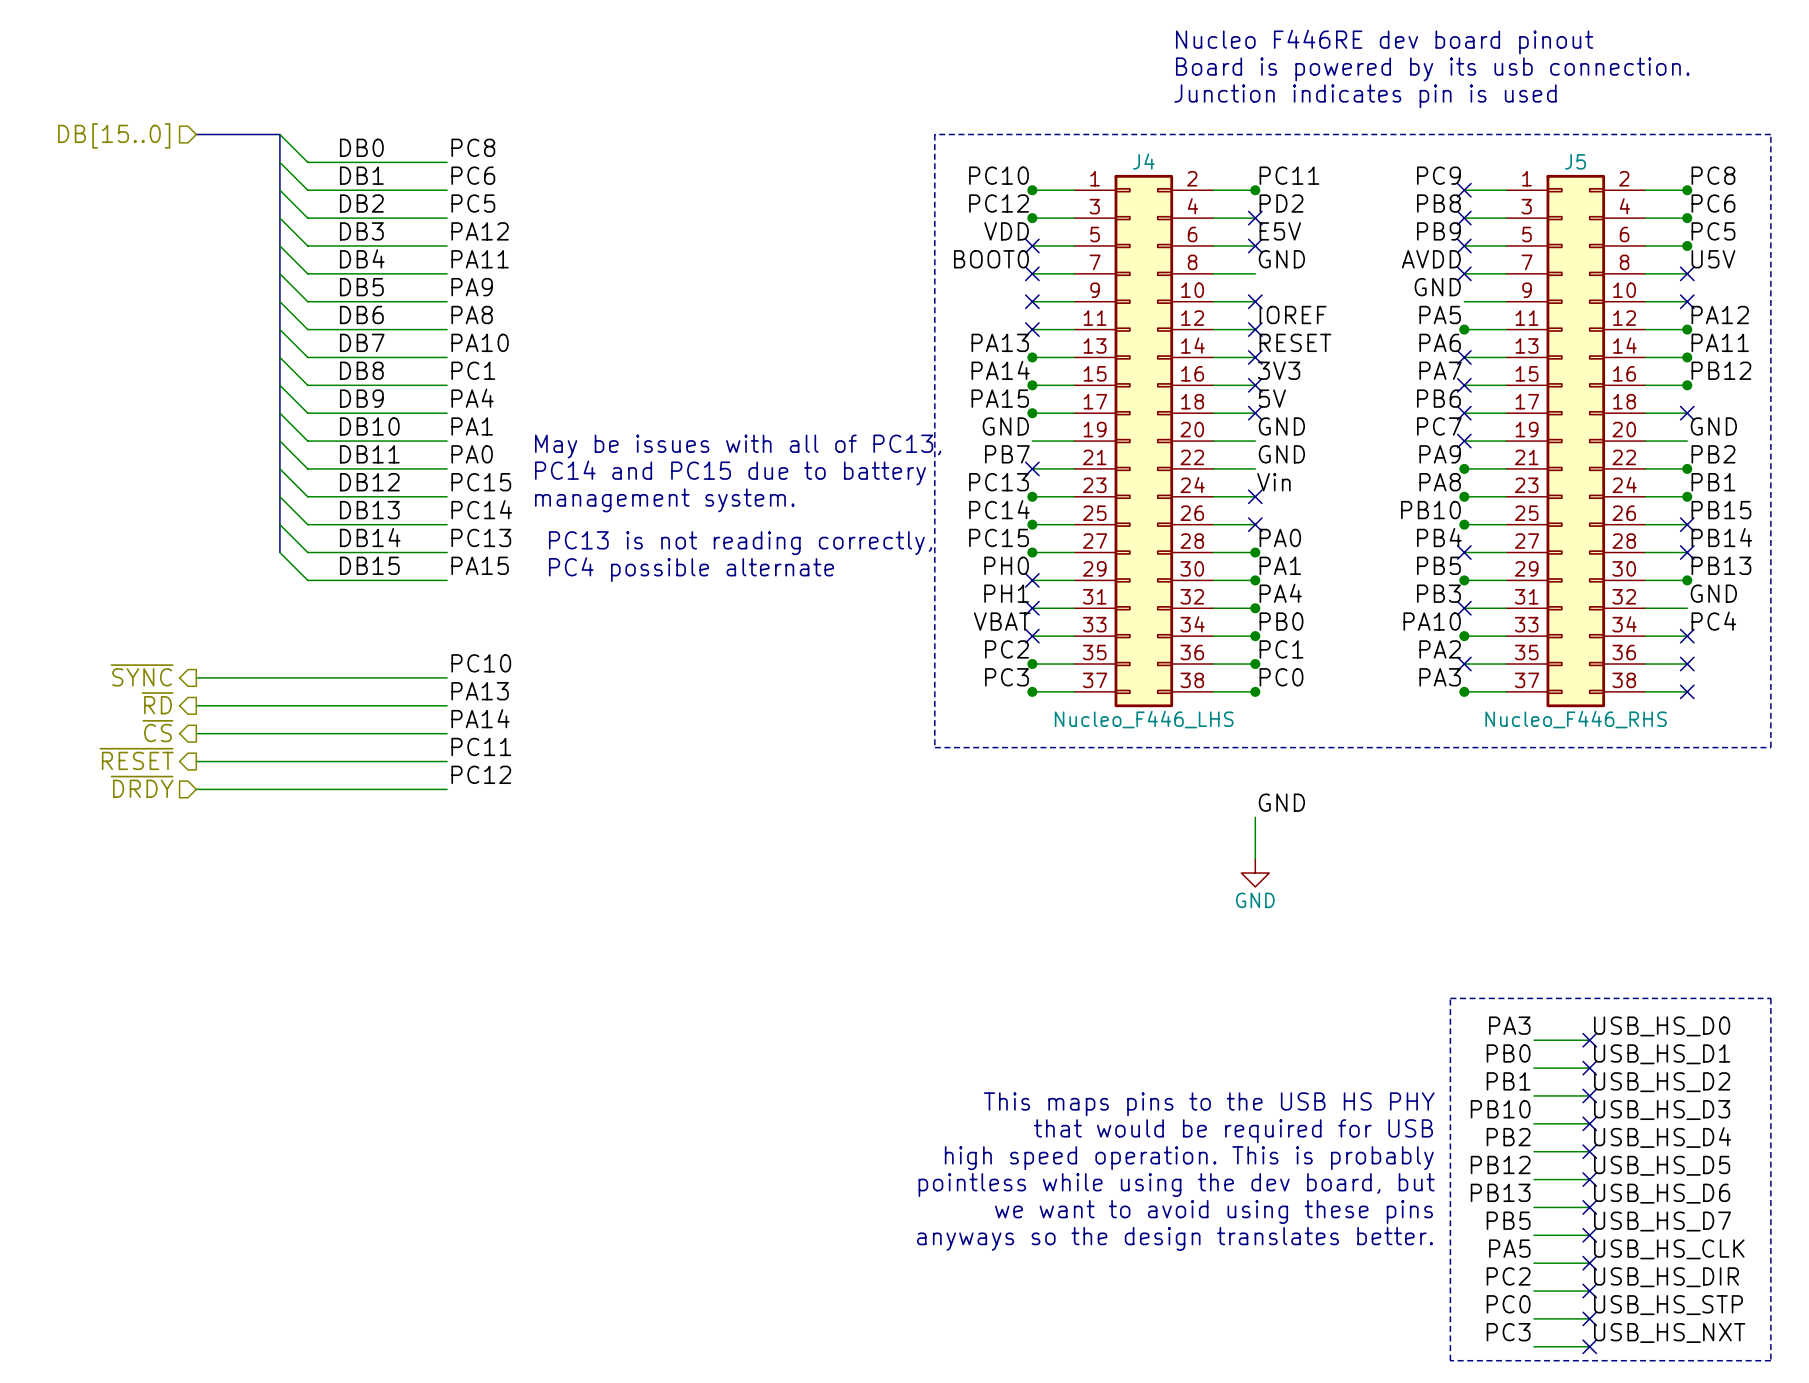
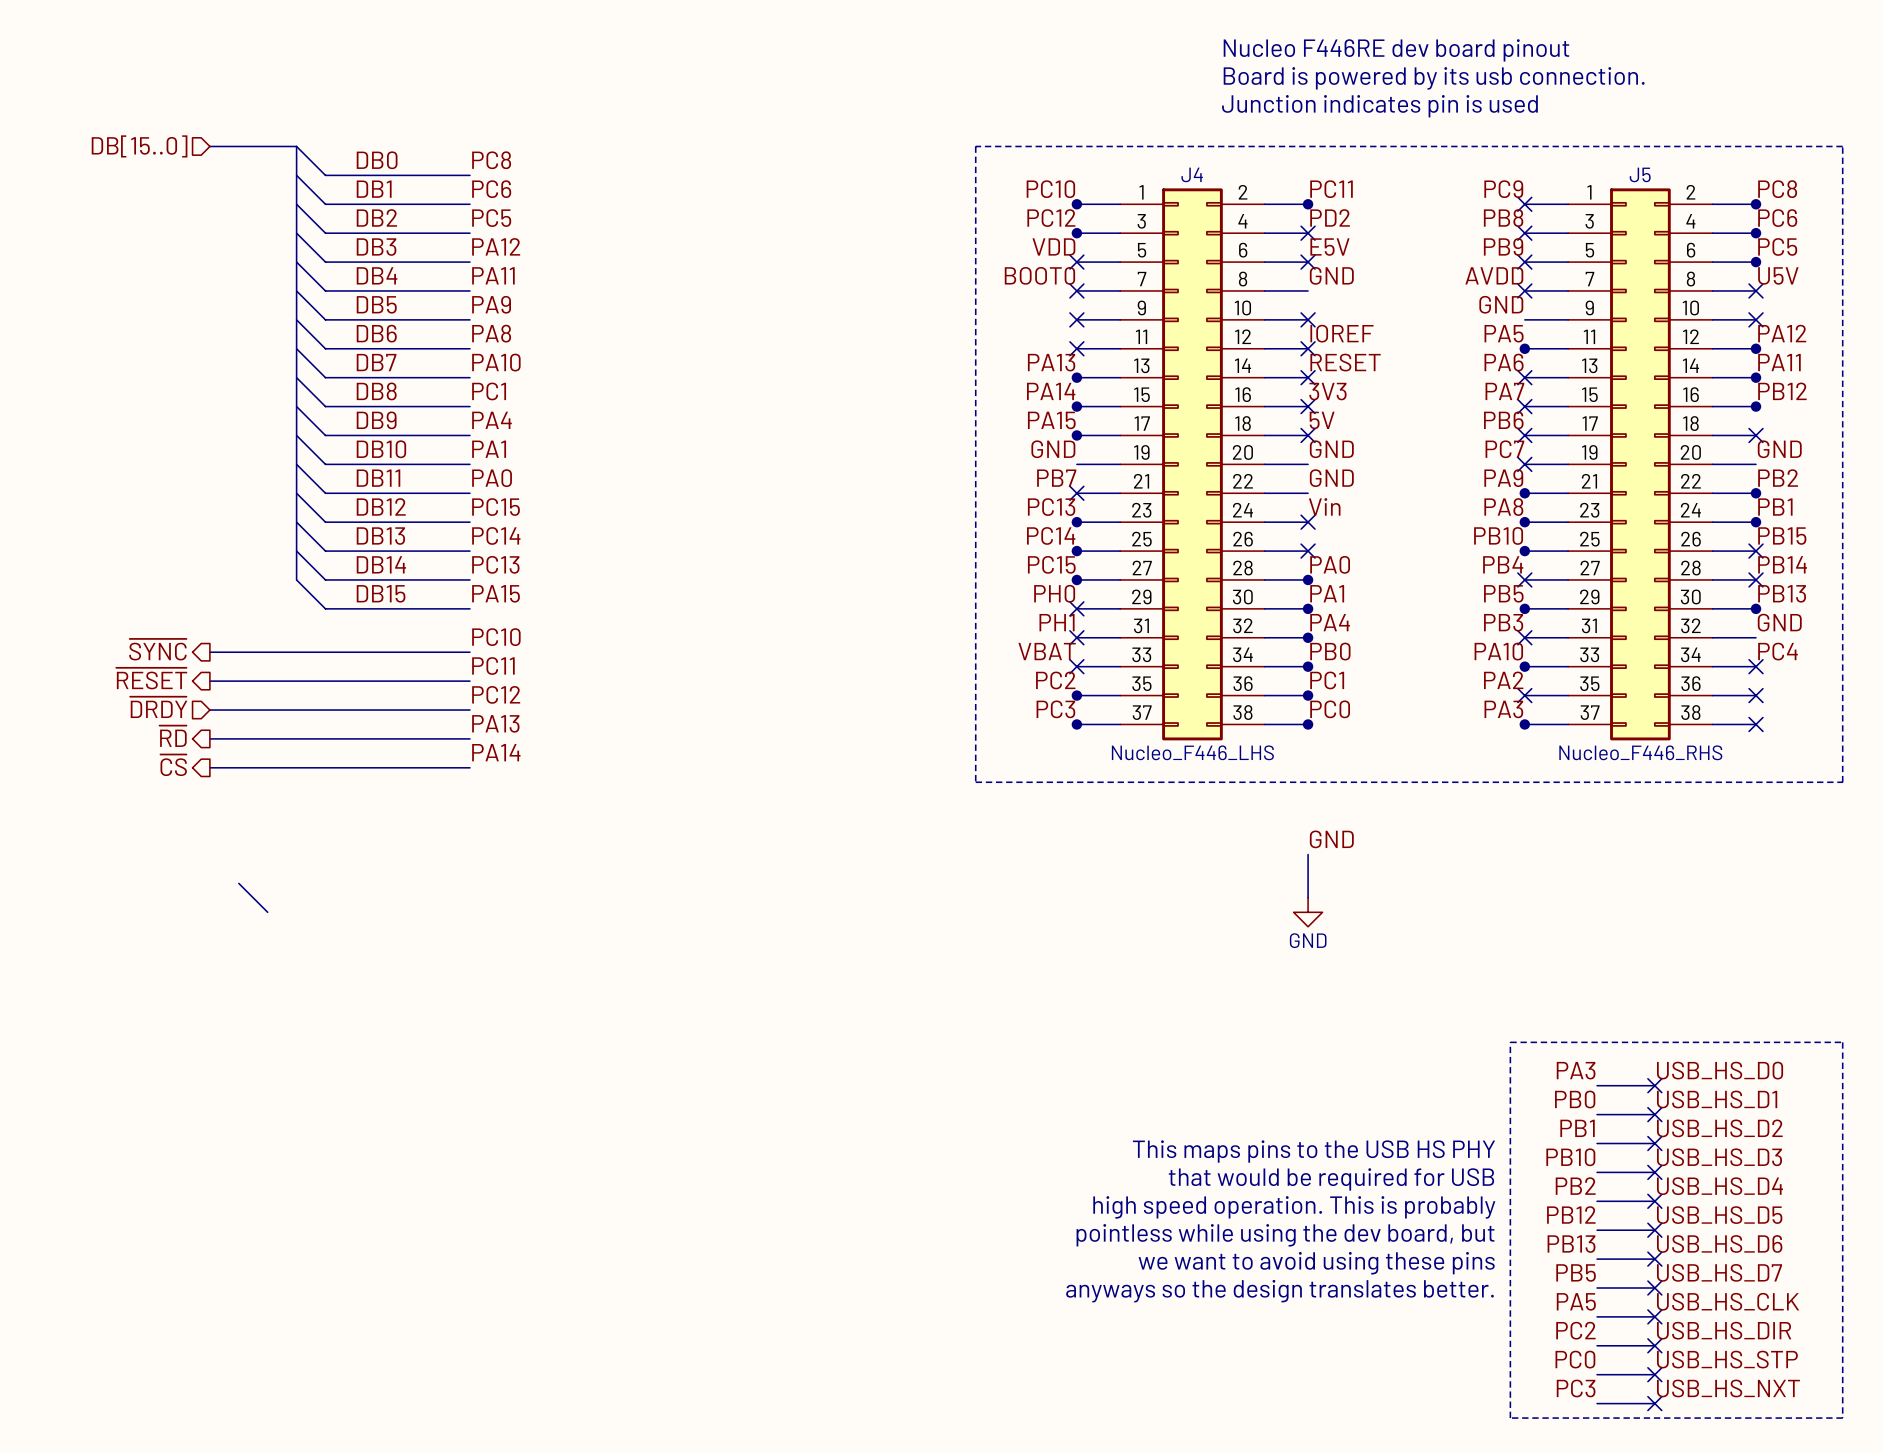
text: May be issues with all of PC13, (738, 446) -> none
text: PC14 and PC15 due to battery (730, 473) -> none
text: management system. (664, 500) -> none
text: PC13 is not reading correctly, (740, 543) -> none
text: PC4 possible alternate (691, 569) -> none
label: none -> PC10 (496, 637)
hierarchical label: none -> ~{SYNC} (157, 649)
label: PC10 (481, 663) -> PC12 (496, 694)
hierarchical label shape: output (142, 675) -> input (158, 707)
hierarchical label: ~{SYNC} (142, 675) -> ~{DRDY} (158, 707)
label position: PC11 (481, 746) -> PC11 (493, 666)
hierarchical label position: ~{RESET} (136, 759) -> ~{RESET} (151, 678)
wire: (196, 761) (447, 761) -> (209, 652) (469, 652)
label: PC12 (481, 774) -> none
hierarchical label: ~{DRDY} (142, 786) -> none
wire: (196, 789) (447, 789) -> (209, 681) (469, 681)
wire: none -> (238, 883) (267, 912)

